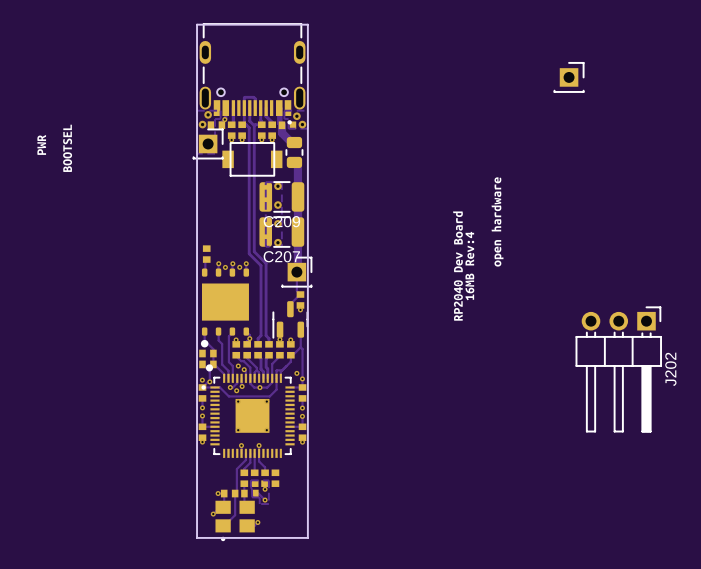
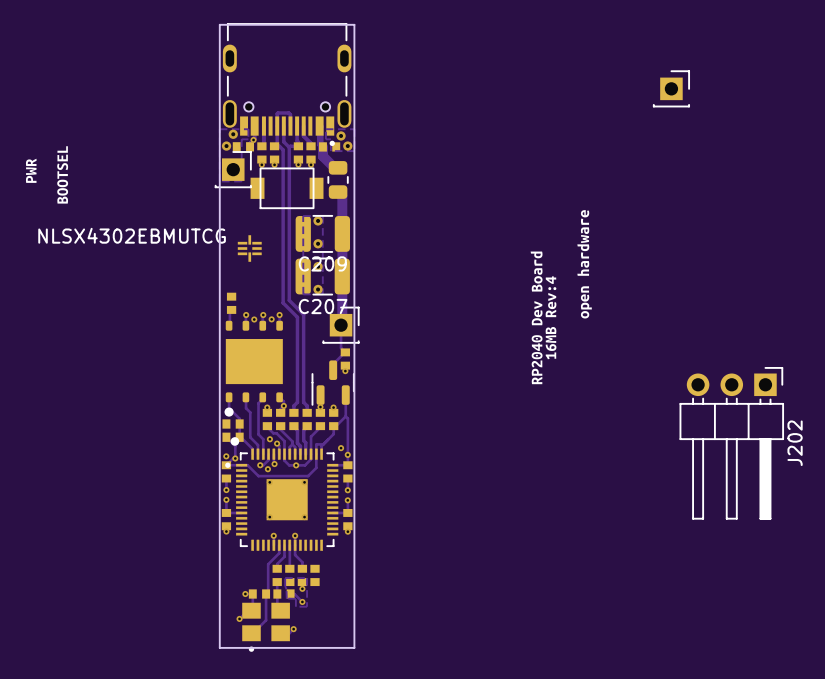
part: none -> NLSX4302EBMUTCG (249, 248)

